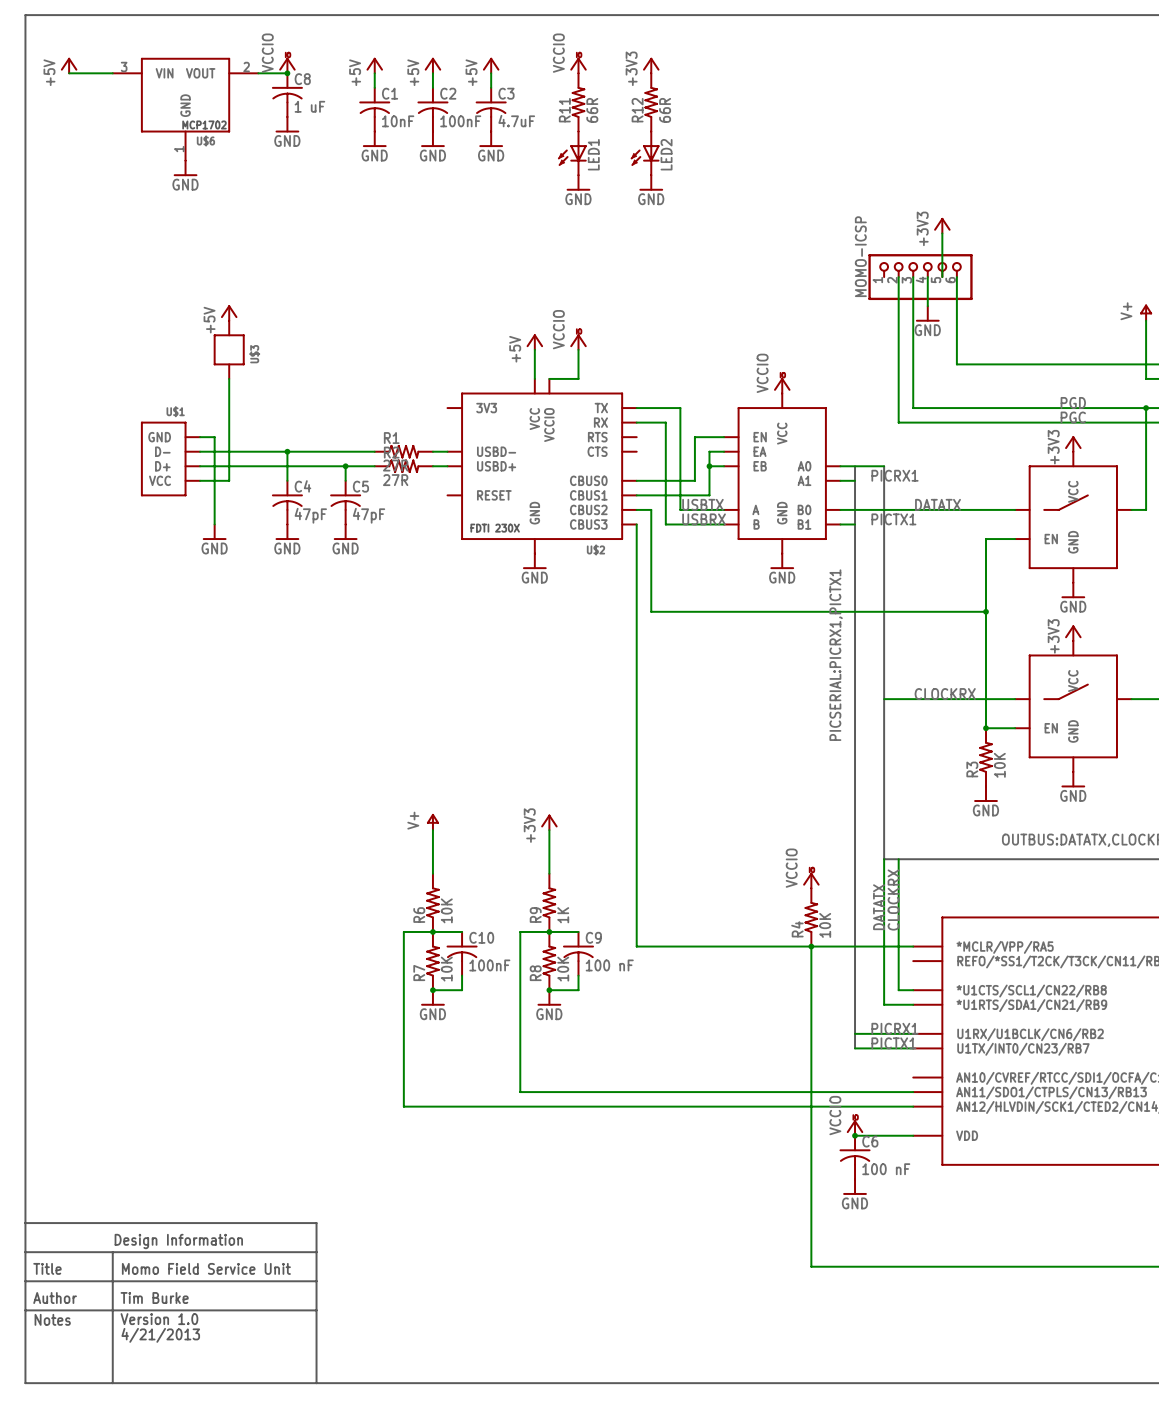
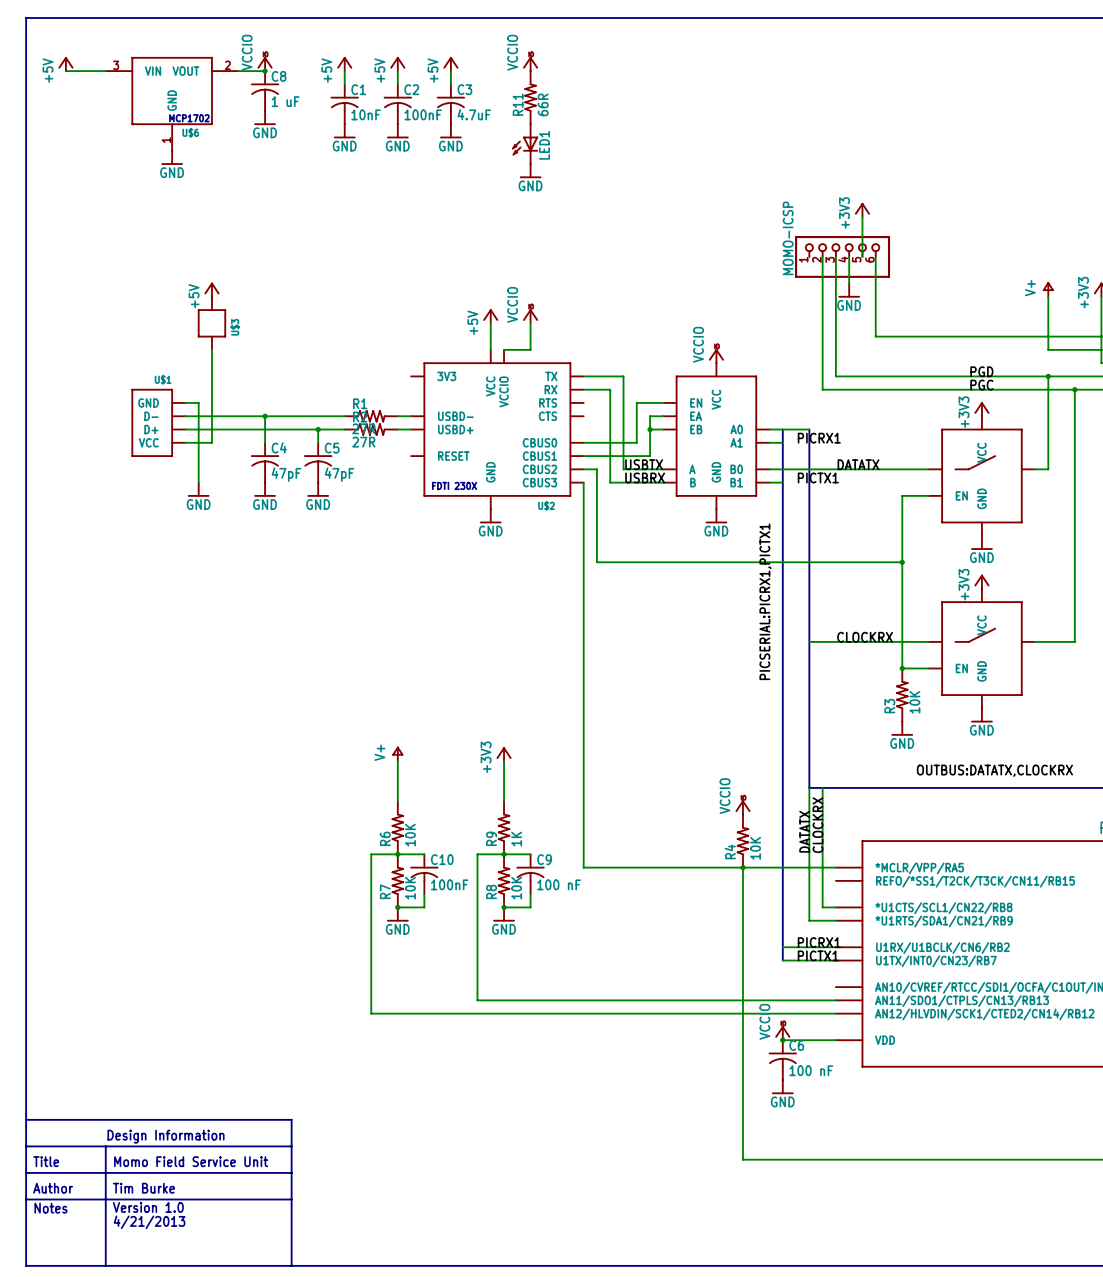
power symbol: +3V3 (651, 65) -> none
R12: 66R (651, 102) -> none
LED2: (645, 153) -> none
power symbol: GND (651, 182) -> none

